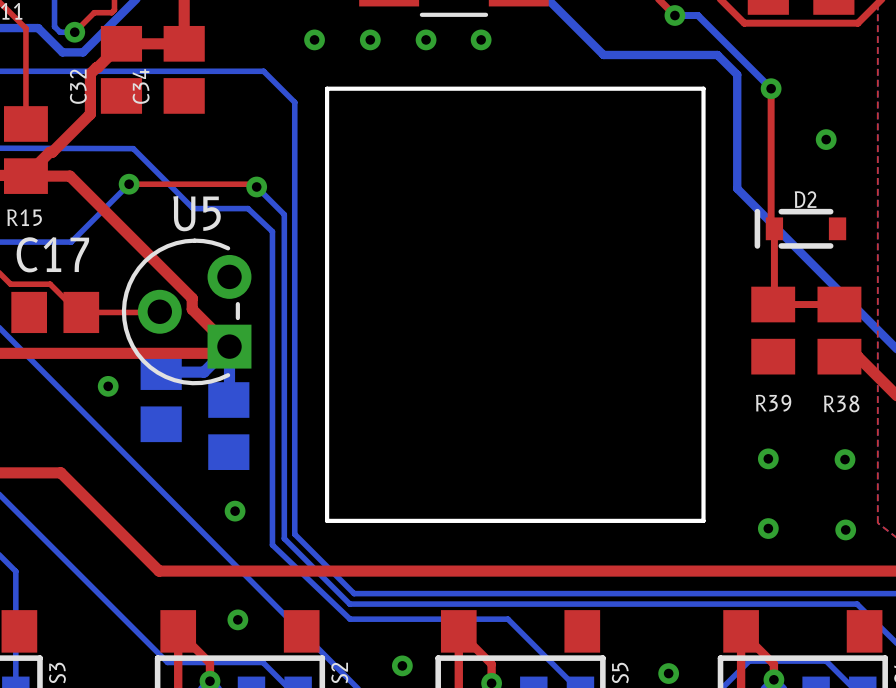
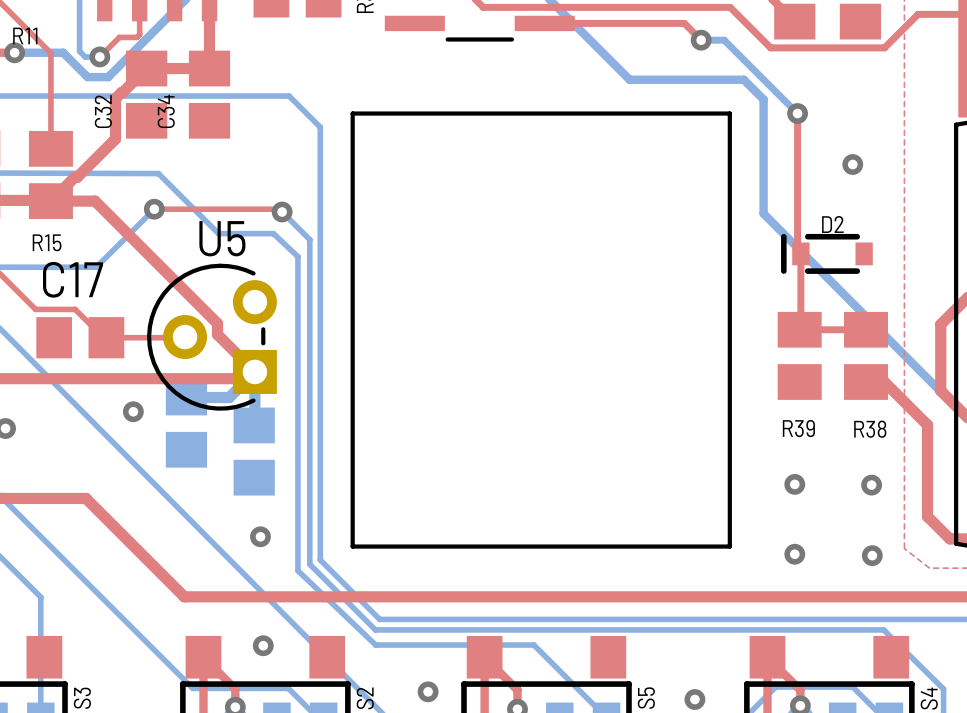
via: (314, 39) -> none
via: (370, 39) -> none
via: (426, 39) -> none
via: (481, 39) -> none

